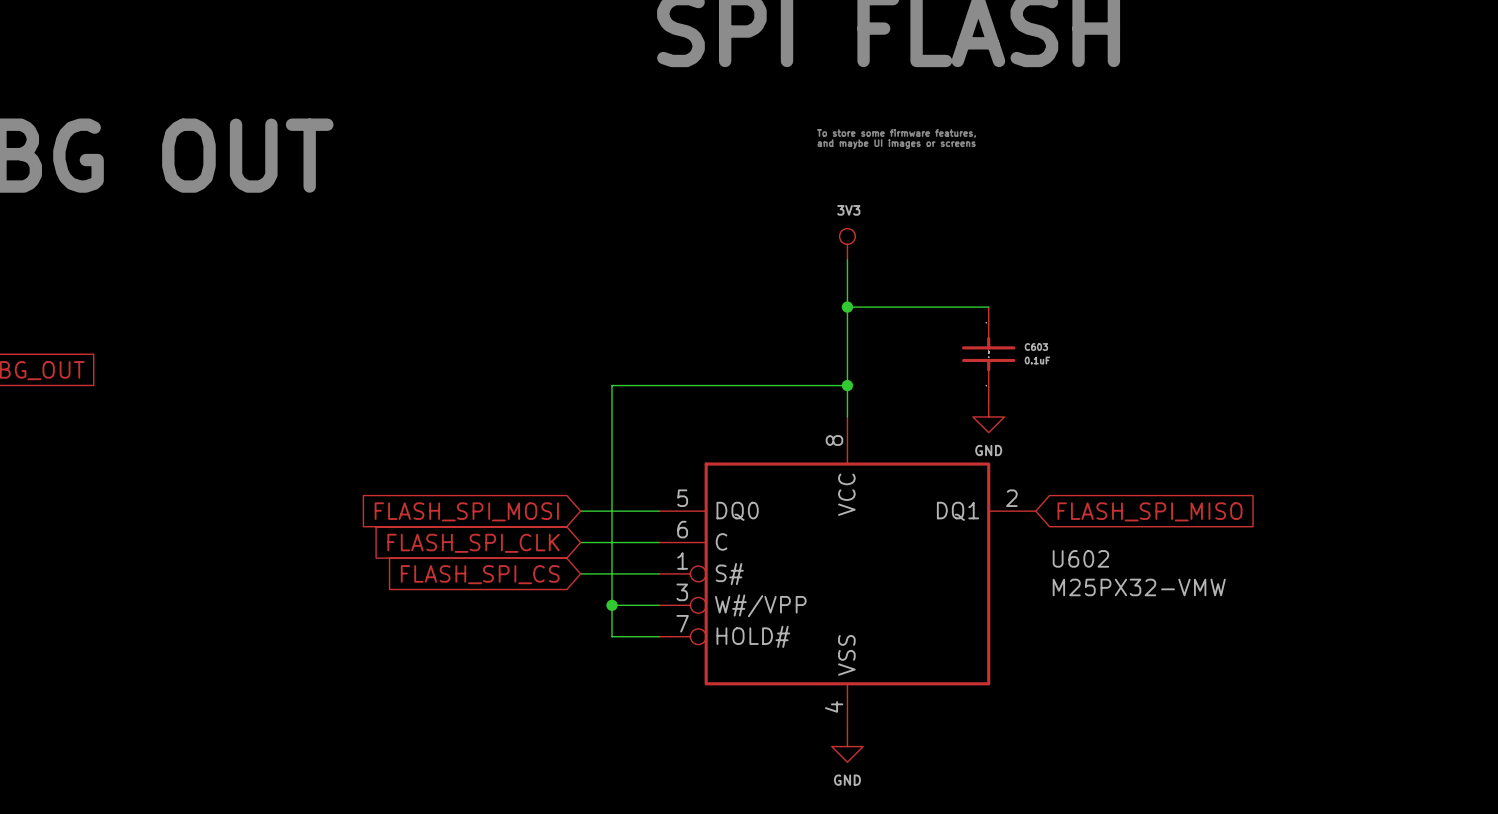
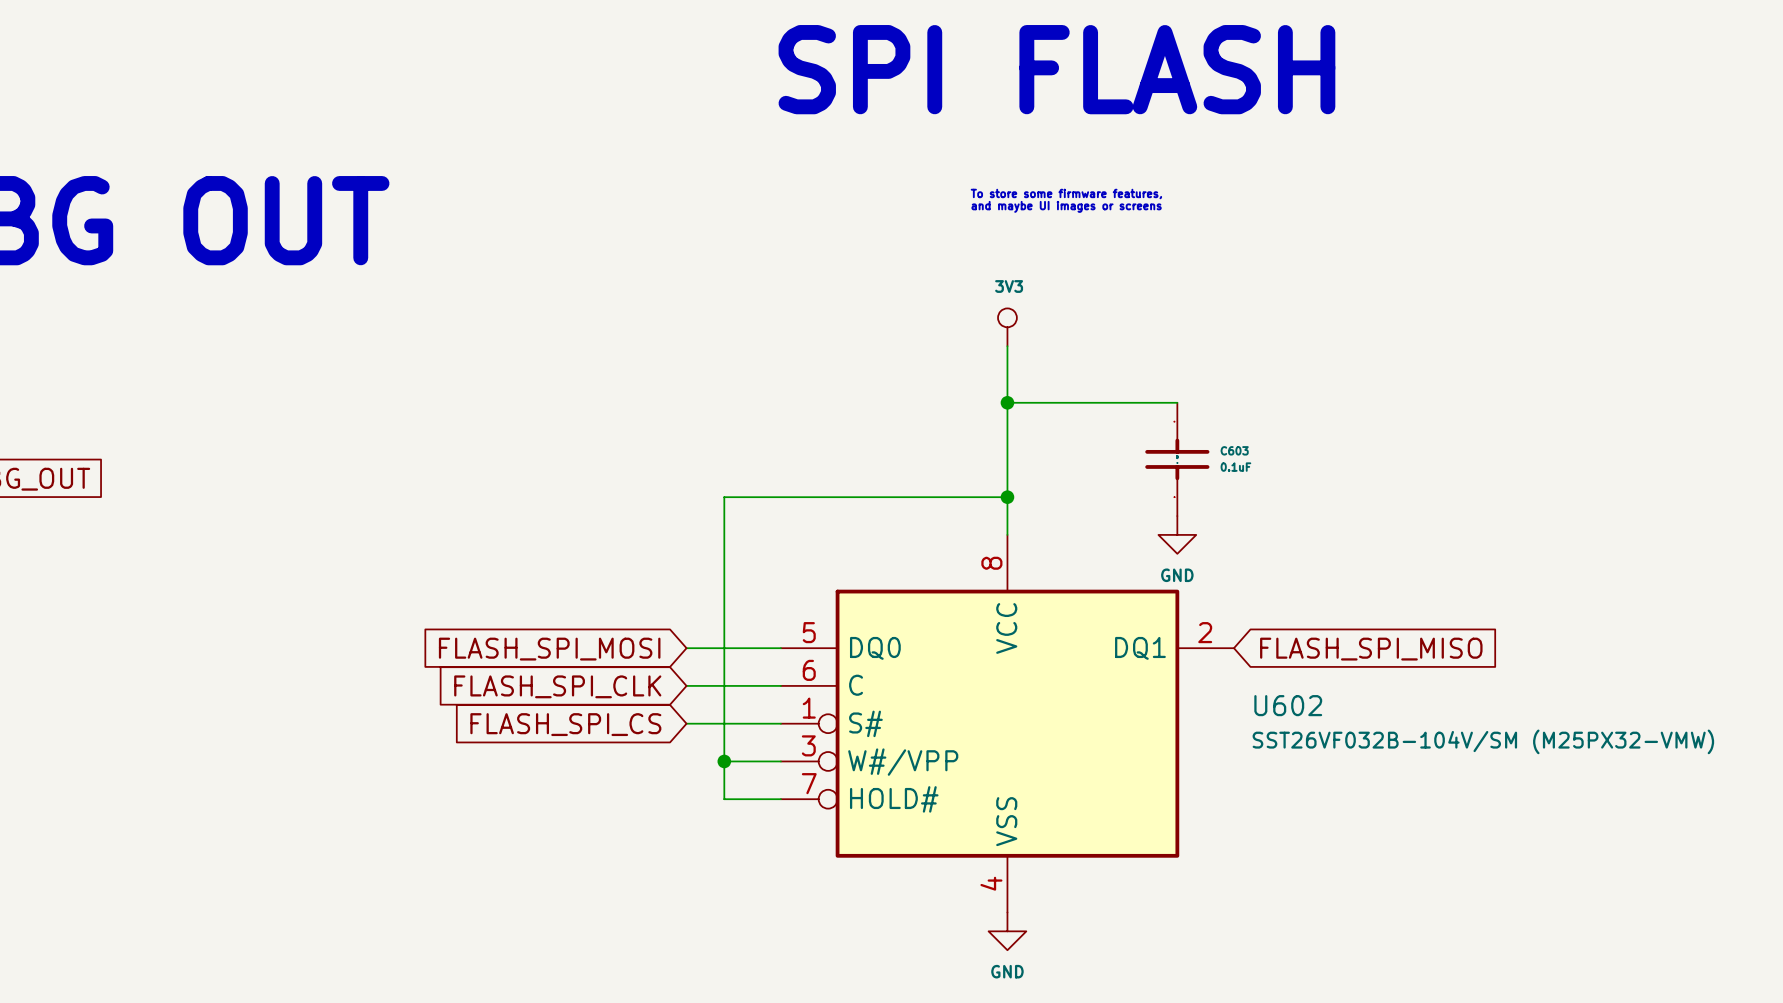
U602 value: M25PX32-VMW (1139, 587) -> SST26VF032B-104V/SM (M25PX32-VMW) (1483, 741)

